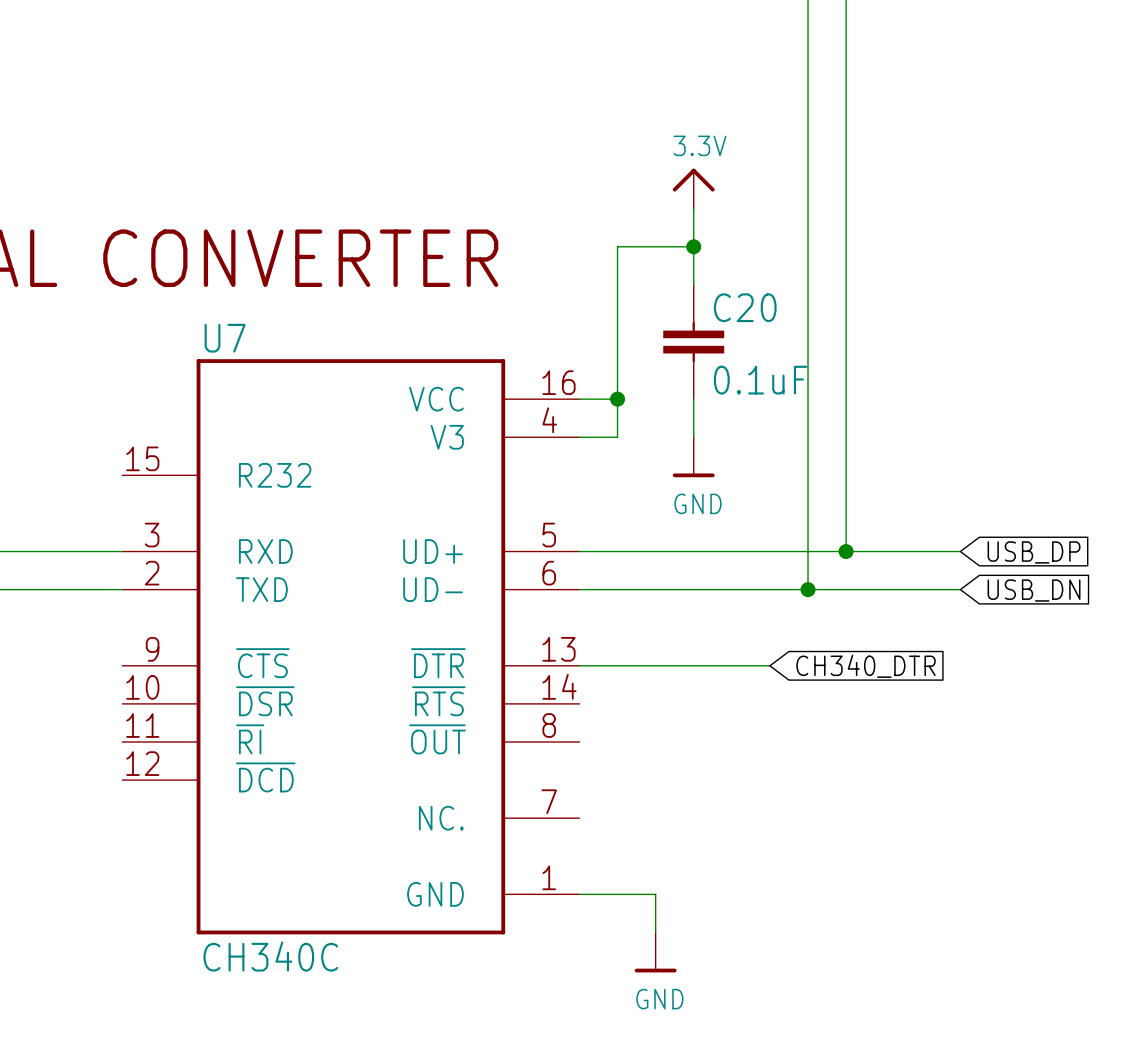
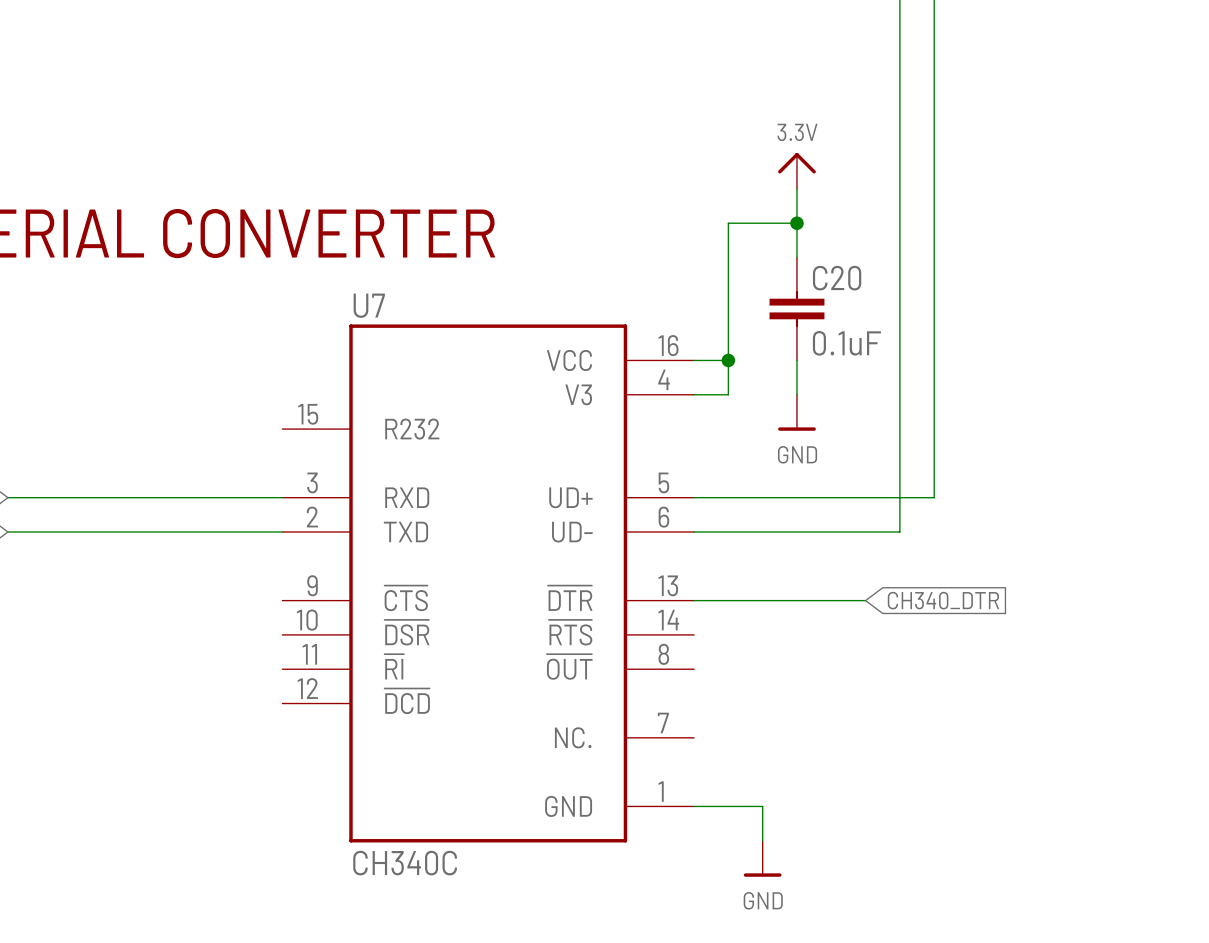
wire: (846, 551) (960, 551) -> none
junction: (846, 551) -> none
global label: USB_DP (1034, 552) -> none
wire: (808, 589) (960, 589) -> none
junction: (808, 589) -> none
global label: USB_DN (1034, 590) -> none

